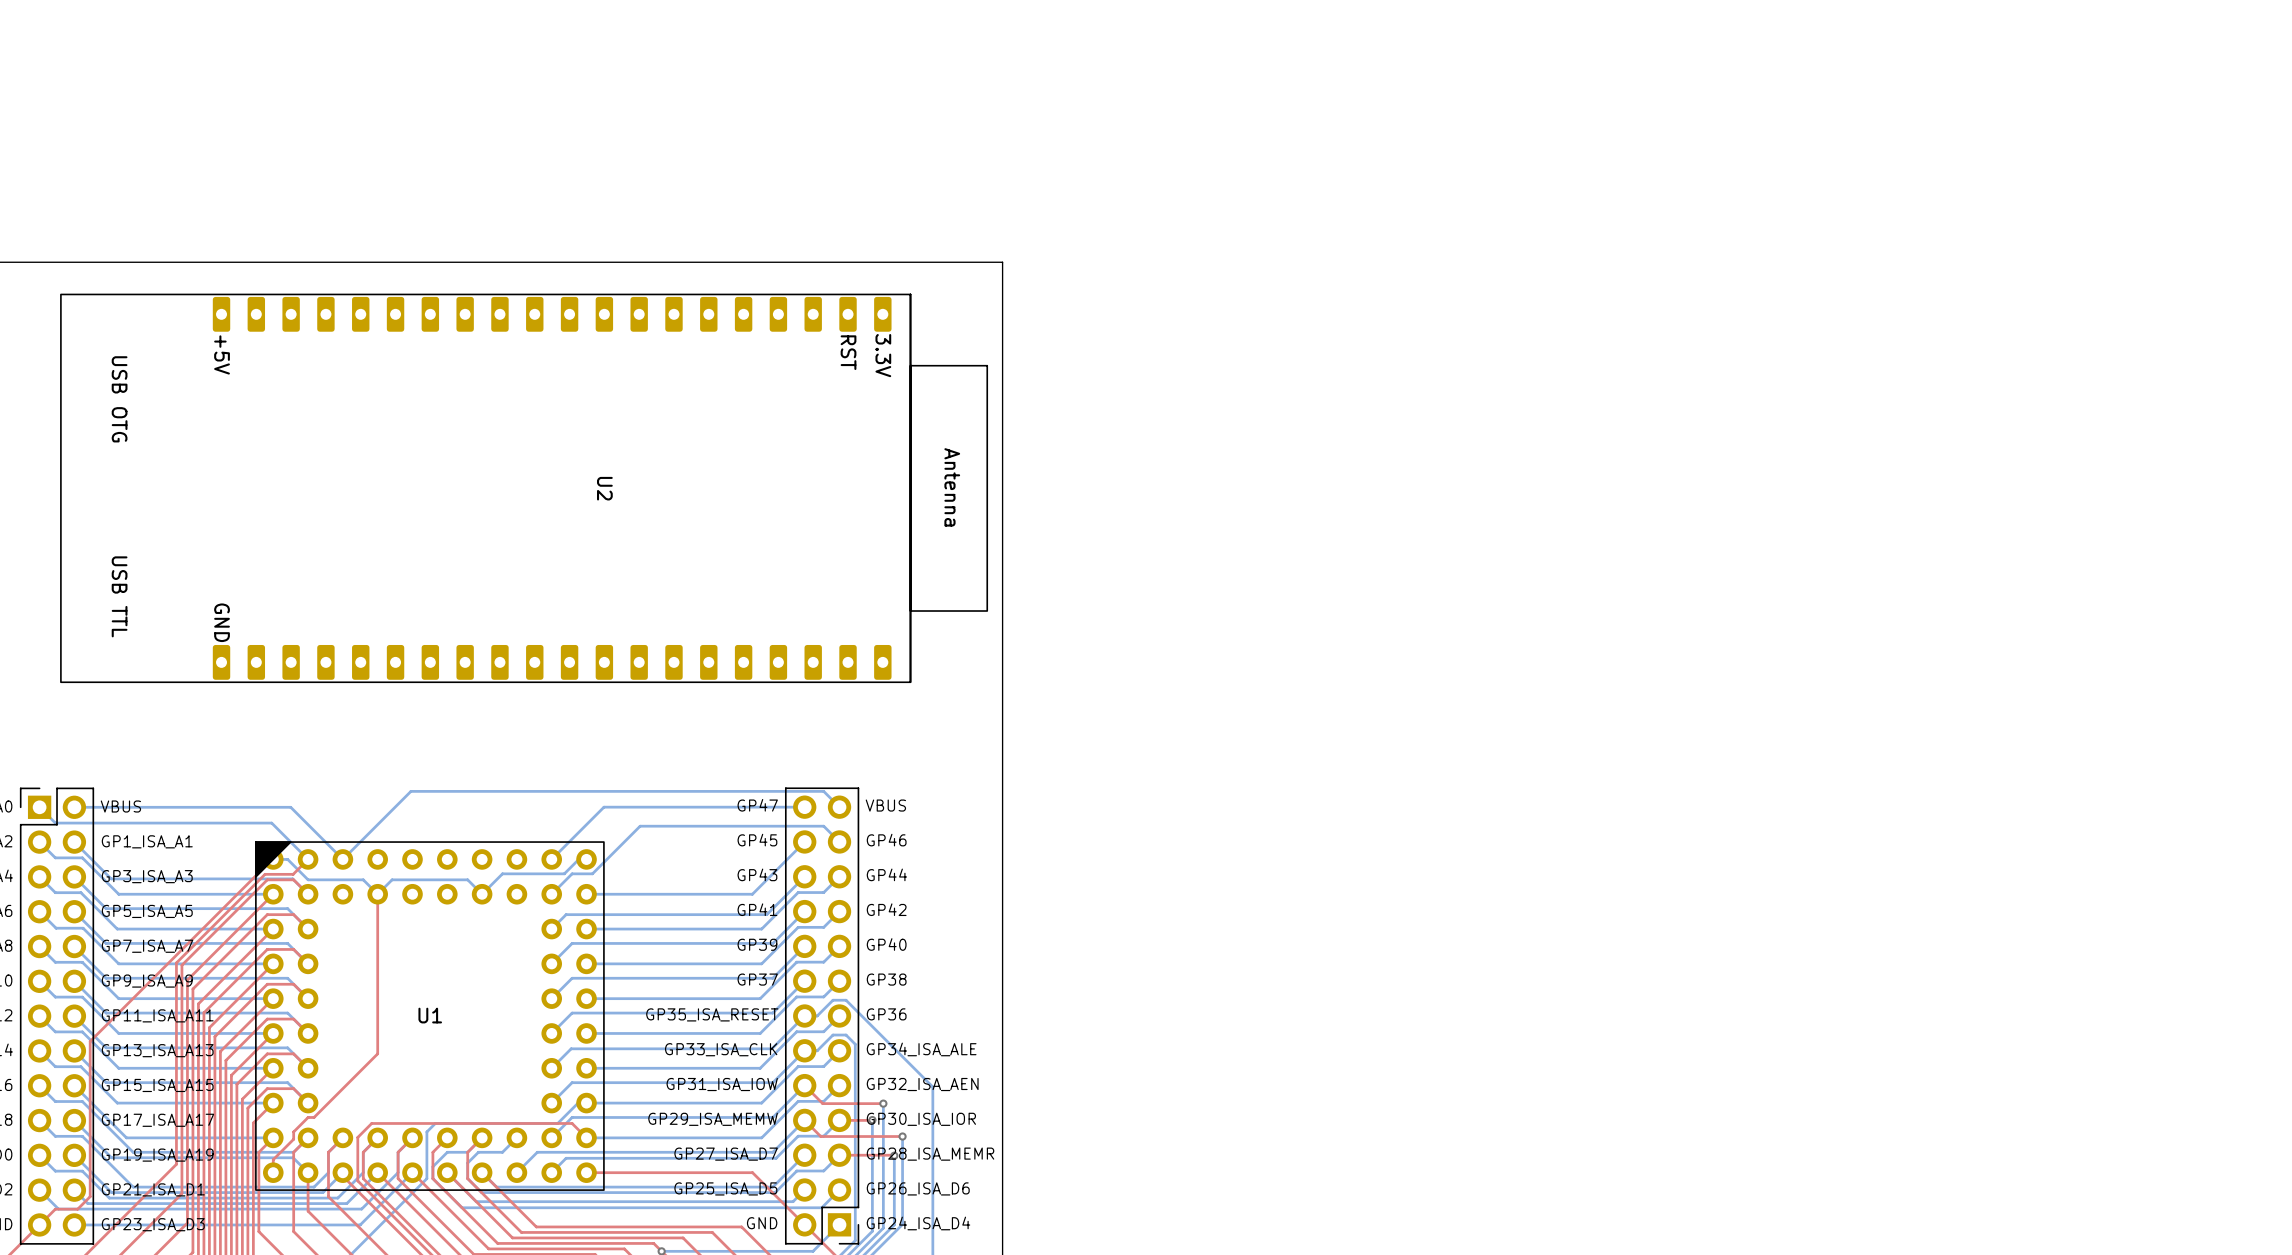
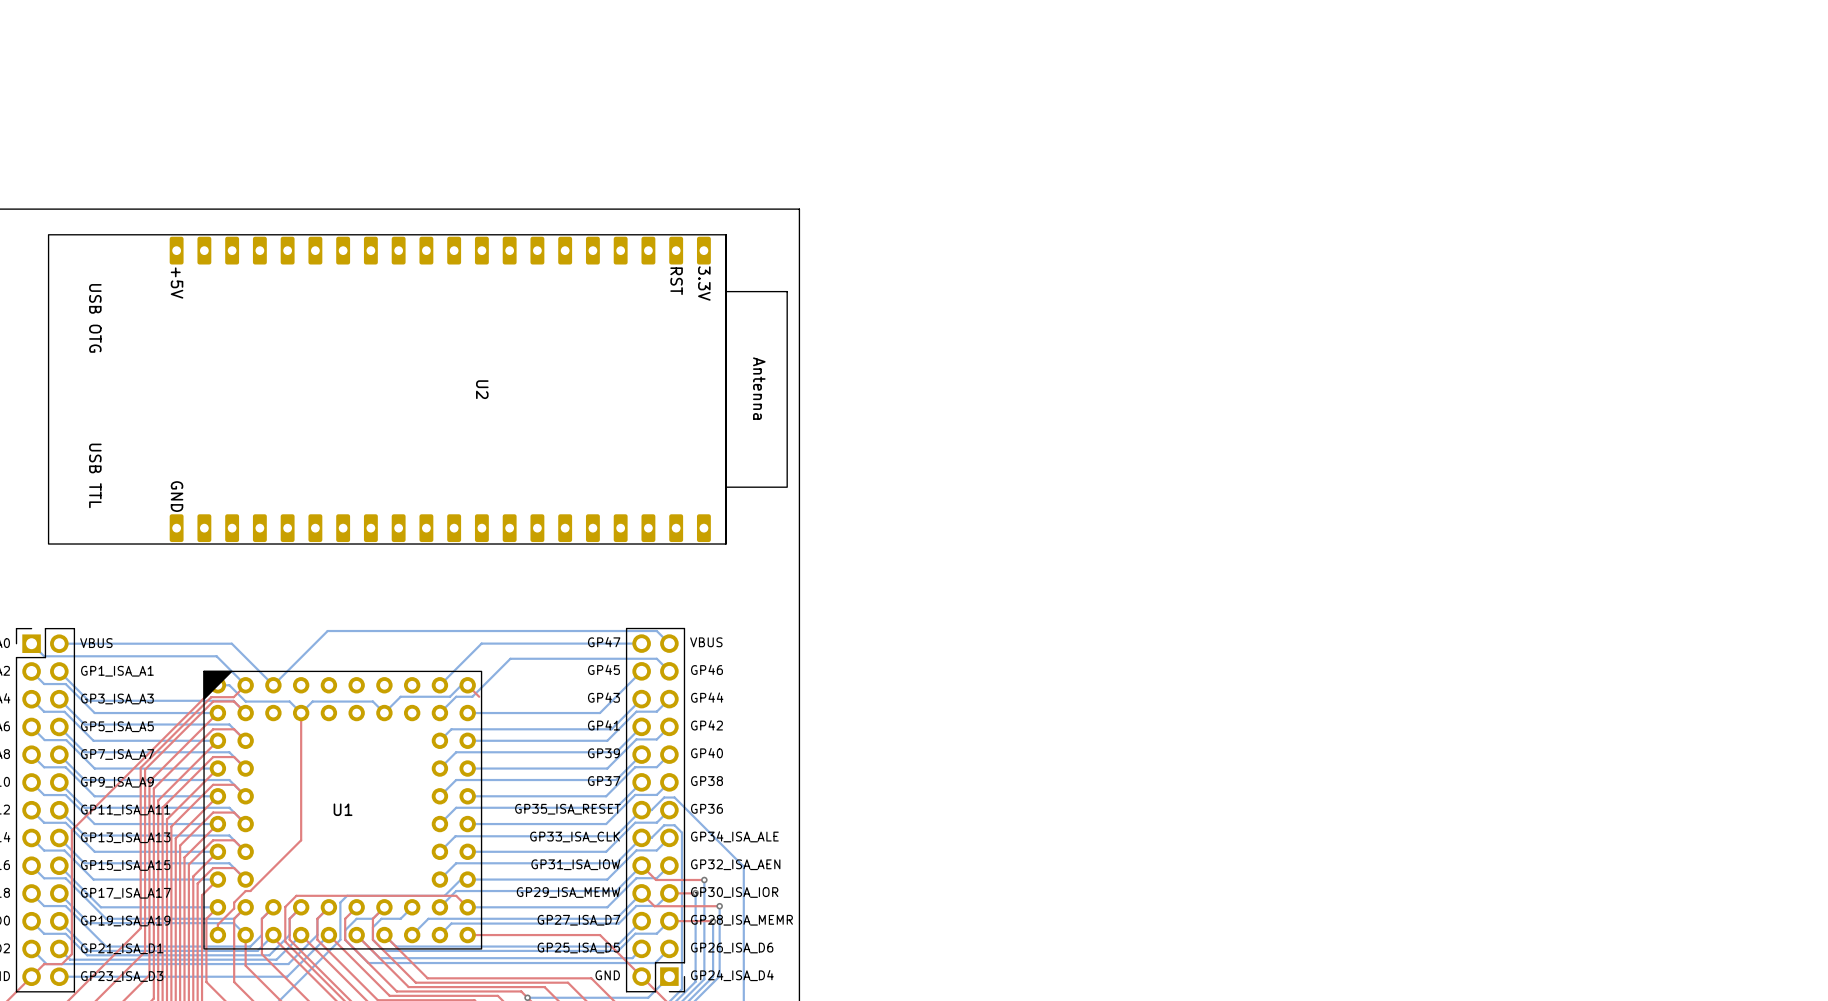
top track: none -> (467, 685) (479, 696)

